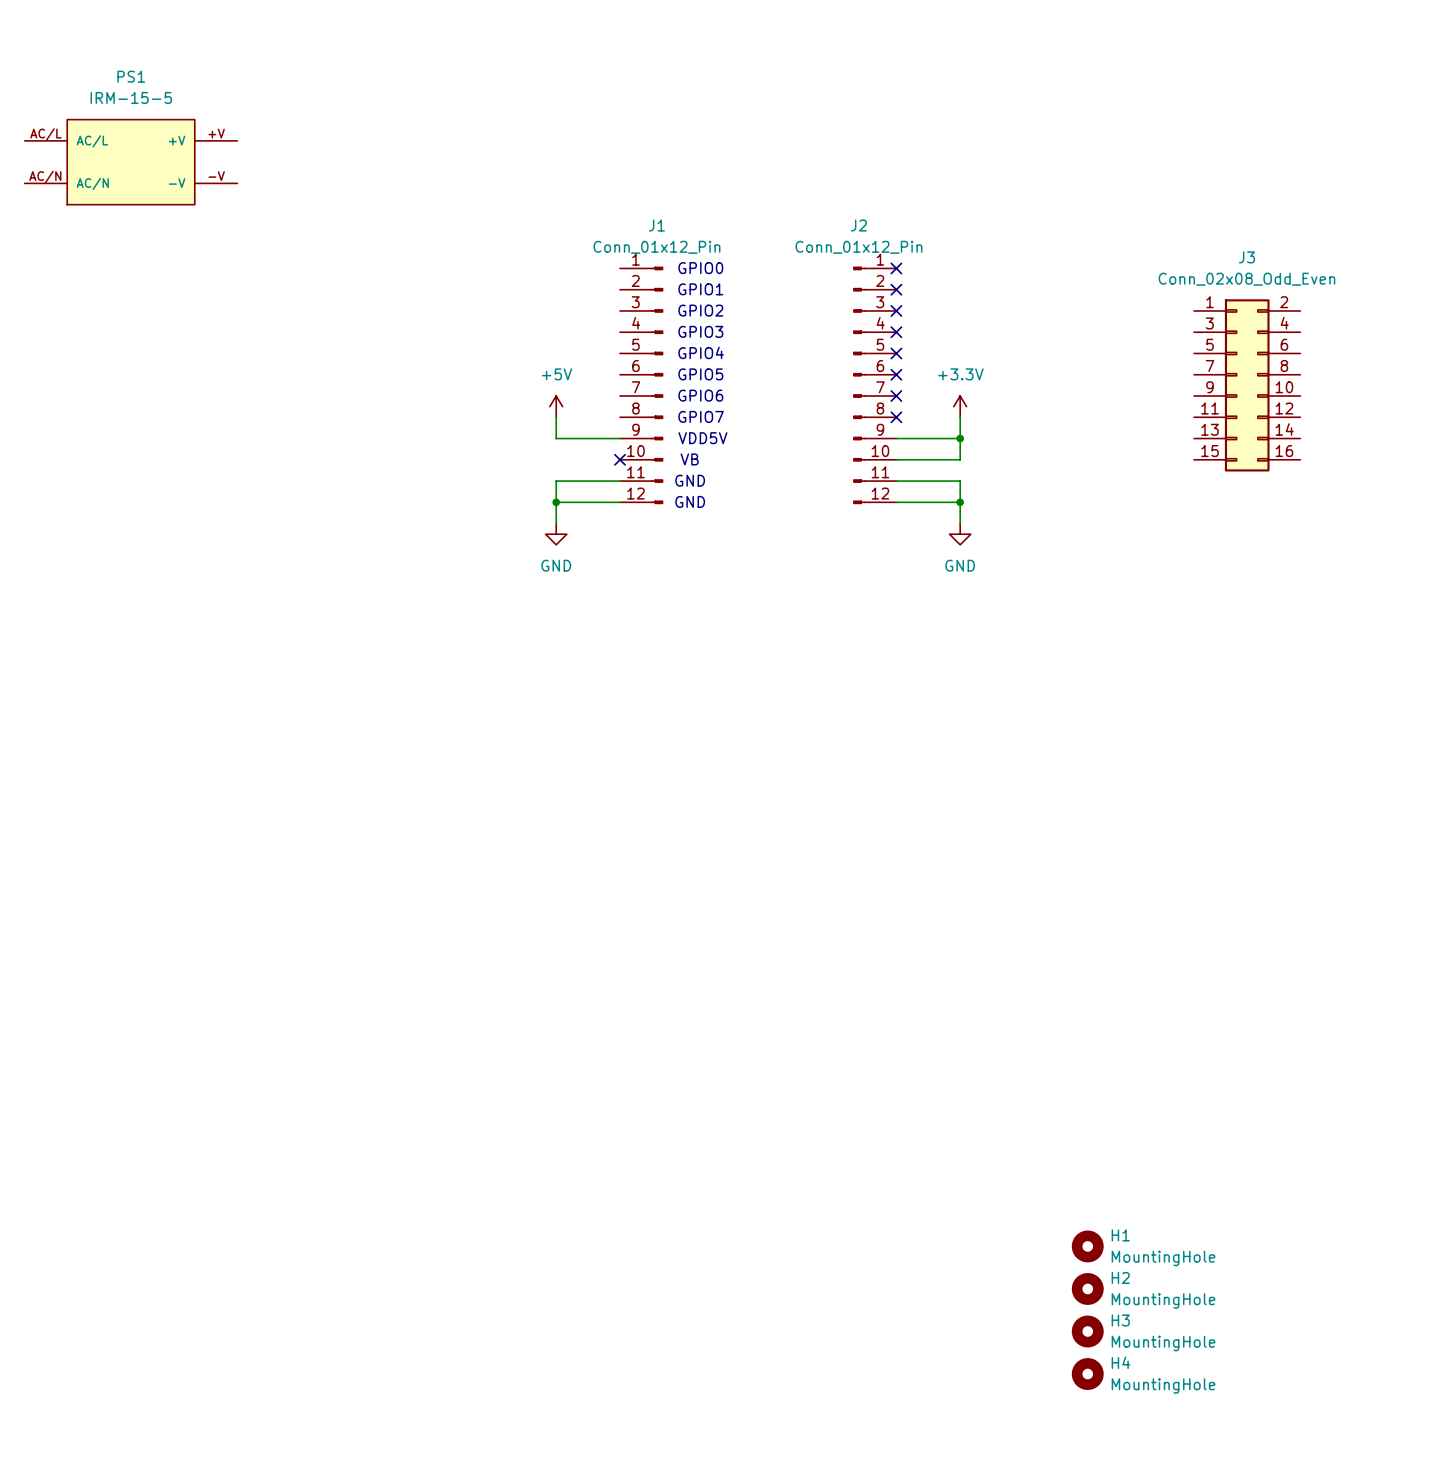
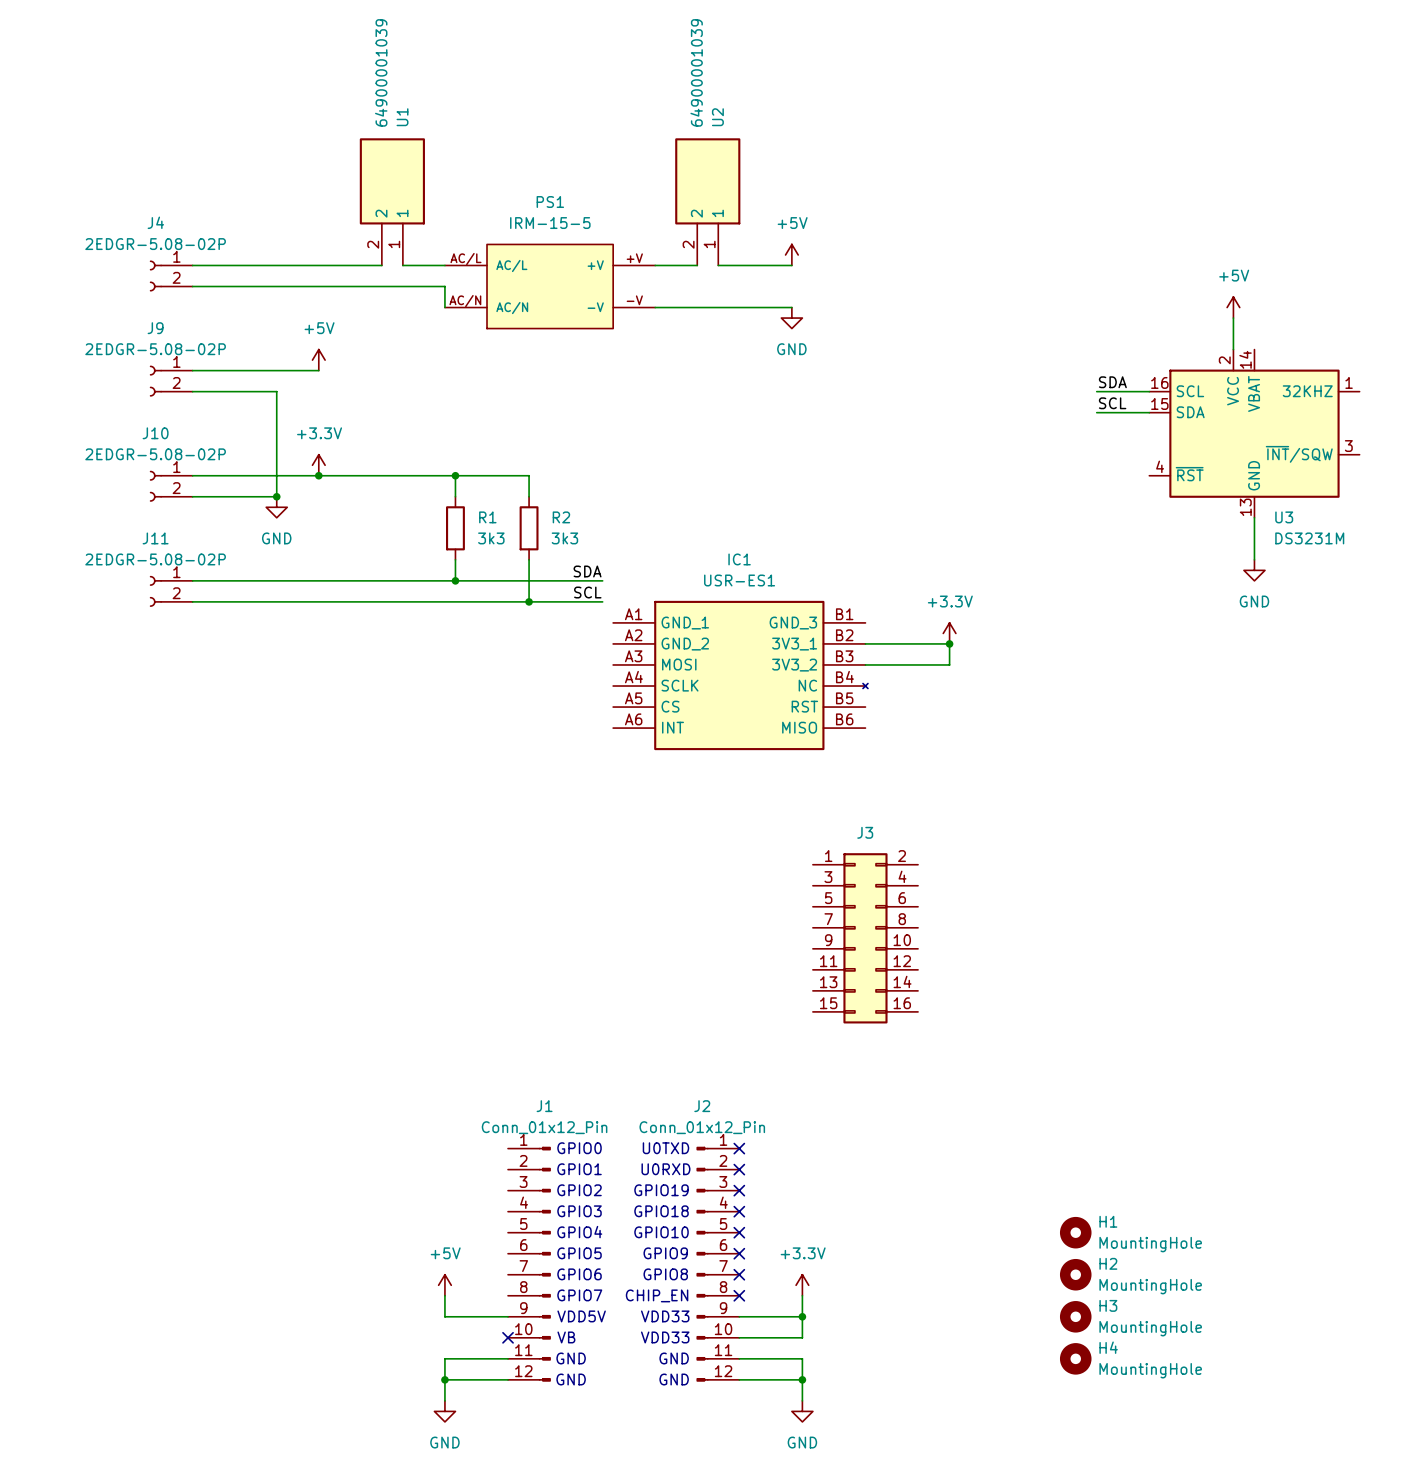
PS1 position: (131, 162) -> (550, 286)
U1: none -> 64900001039 (392, 201)
U2: none -> 64900001039 (707, 201)
power symbol: none -> +5V (791, 254)
J3 name position: J3 (1246, 257) -> J3 (865, 832)
wire: none -> (192, 265) (381, 265)
wire: none -> (402, 265) (444, 265)
wire: none -> (655, 265) (697, 265)
text: GPIO0 (700, 268) -> none
wire: none -> (718, 265) (791, 265)
no-connect mark: (896, 268) -> none
J4: none -> 2EDGR-5.08-02P (171, 275)
J3 value: Conn_02x08_Odd_Even (1246, 279) -> none
wire: none -> (192, 286) (444, 286) (444, 307)
text: GPIO1 (700, 289) -> none
no-connect mark: (896, 289) -> none
wire: none -> (655, 307) (791, 307)
text: GPIO2 (700, 310) -> none
no-connect mark: (896, 310) -> none
power symbol: none -> +5V (1233, 307)
power symbol: none -> GND (791, 318)
text: GPIO3 (700, 331) -> none
no-connect mark: (896, 332) -> none
text: GPIO4 (701, 352) -> none
no-connect mark: (896, 353) -> none
power symbol: none -> +5V (318, 360)
wire: none -> (192, 370) (318, 370)
text: GPIO5 (700, 374) -> none
no-connect mark: (896, 374) -> none
J9: none -> 2EDGR-5.08-02P (171, 381)
J1 position: (641, 385) -> (529, 1264)
J2 position: (874, 385) -> (717, 1264)
J3 position: (1247, 385) -> (865, 938)
label: none -> SDA (1112, 382)
text: GPIO6 (700, 395) -> none
wire: none -> (192, 391) (276, 391) (276, 496) (192, 496)
no-connect mark: (896, 396) -> none
wire: none -> (1096, 391) (1149, 391)
power symbol: +5V (556, 406) -> none
power symbol: +3.3V (960, 406) -> none
label: none -> SCL (1112, 403)
text: GPIO7 (701, 416) -> none
wire: (556, 417) (556, 438) (620, 438) -> none
no-connect mark: (896, 417) -> none
wire: (960, 417) (960, 459) (896, 459) -> none
wire: none -> (1096, 412) (1149, 412)
text: VDD5V (702, 438) -> none
wire: (896, 438) (960, 438) -> none
junction: (960, 438) -> none
U3: none -> DS3231M (1254, 433)
no-connect mark: (620, 459) -> none
text: VB (689, 459) -> none
power symbol: none -> +3.3V (318, 465)
text: GND (690, 480) -> none
wire: none -> (192, 475) (529, 475) (529, 496)
junction: none -> (318, 475)
wire: none -> (455, 475) (455, 496)
junction: none -> (455, 475)
wire: (620, 481) (556, 481) (556, 523) -> none
wire: (896, 481) (960, 481) (960, 523) -> none
J10: none -> 2EDGR-5.08-02P (171, 486)
text: GND (690, 501) -> none
junction: none -> (276, 496)
wire: (556, 502) (620, 502) -> none
junction: (556, 502) -> none
wire: (896, 502) (960, 502) -> none
junction: (960, 502) -> none
power symbol: none -> GND (276, 507)
wire: none -> (1254, 517) (1254, 559)
R1: none -> 3k3 (455, 528)
R2: none -> 3k3 (529, 528)
power symbol: GND (556, 534) -> none
power symbol: GND (960, 534) -> none
wire: none -> (455, 559) (455, 580)
wire: none -> (529, 559) (529, 601)
power symbol: none -> GND (1254, 570)
label: none -> SDA (587, 571)
wire: none -> (192, 580) (602, 580)
junction: none -> (455, 580)
J11: none -> 2EDGR-5.08-02P (171, 591)
label: none -> SCL (587, 592)
wire: none -> (192, 601) (602, 601)
junction: none -> (529, 601)
power symbol: none -> +3.3V (949, 633)
wire: none -> (865, 643) (949, 643) (949, 664) (865, 664)
junction: none -> (949, 643)
IC1: none -> USR-ES1 (740, 675)
text: none -> GPIO0 (579, 1148)
text: none -> U0TXD (665, 1148)
no-connect mark: none -> (739, 1148)
text: none -> GPIO1 (579, 1169)
text: none -> U0RXD (665, 1169)
no-connect mark: none -> (739, 1169)
text: none -> GPIO2 (579, 1190)
text: none -> GPIO19 (661, 1190)
no-connect mark: none -> (739, 1190)
text: none -> GPIO3 (579, 1211)
text: none -> GPIO18 (661, 1211)
no-connect mark: none -> (739, 1211)
text: none -> GPIO4 (579, 1232)
text: none -> GPIO10 (661, 1232)
no-connect mark: none -> (739, 1232)
text: none -> GPIO5 (579, 1253)
text: none -> GPIO9 (665, 1253)
no-connect mark: none -> (739, 1253)
text: none -> GPIO6 (579, 1274)
text: none -> GPIO8 (665, 1274)
no-connect mark: none -> (739, 1274)
power symbol: none -> +5V (444, 1285)
power symbol: none -> +3.3V (802, 1285)
text: none -> GPIO7 (579, 1295)
wire: none -> (444, 1295) (444, 1316) (508, 1316)
text: none -> CHIP_EN (657, 1295)
no-connect mark: none -> (739, 1295)
wire: none -> (802, 1295) (802, 1337) (739, 1337)
text: none -> VDD5V (581, 1316)
text: none -> VDD33 (665, 1316)
wire: none -> (739, 1316) (802, 1316)
junction: none -> (802, 1316)
no-connect mark: none -> (508, 1337)
text: none -> VB (566, 1337)
text: none -> VDD33 (665, 1337)
text: none -> GND (571, 1358)
text: none -> GND (674, 1358)
wire: none -> (508, 1358) (444, 1358) (444, 1400)
wire: none -> (739, 1358) (802, 1358) (802, 1400)
text: none -> GND (571, 1379)
text: none -> GND (674, 1379)
wire: none -> (444, 1379) (508, 1379)
junction: none -> (444, 1379)
wire: none -> (739, 1379) (802, 1379)
junction: none -> (802, 1379)
power symbol: none -> GND (444, 1411)
power symbol: none -> GND (802, 1411)

